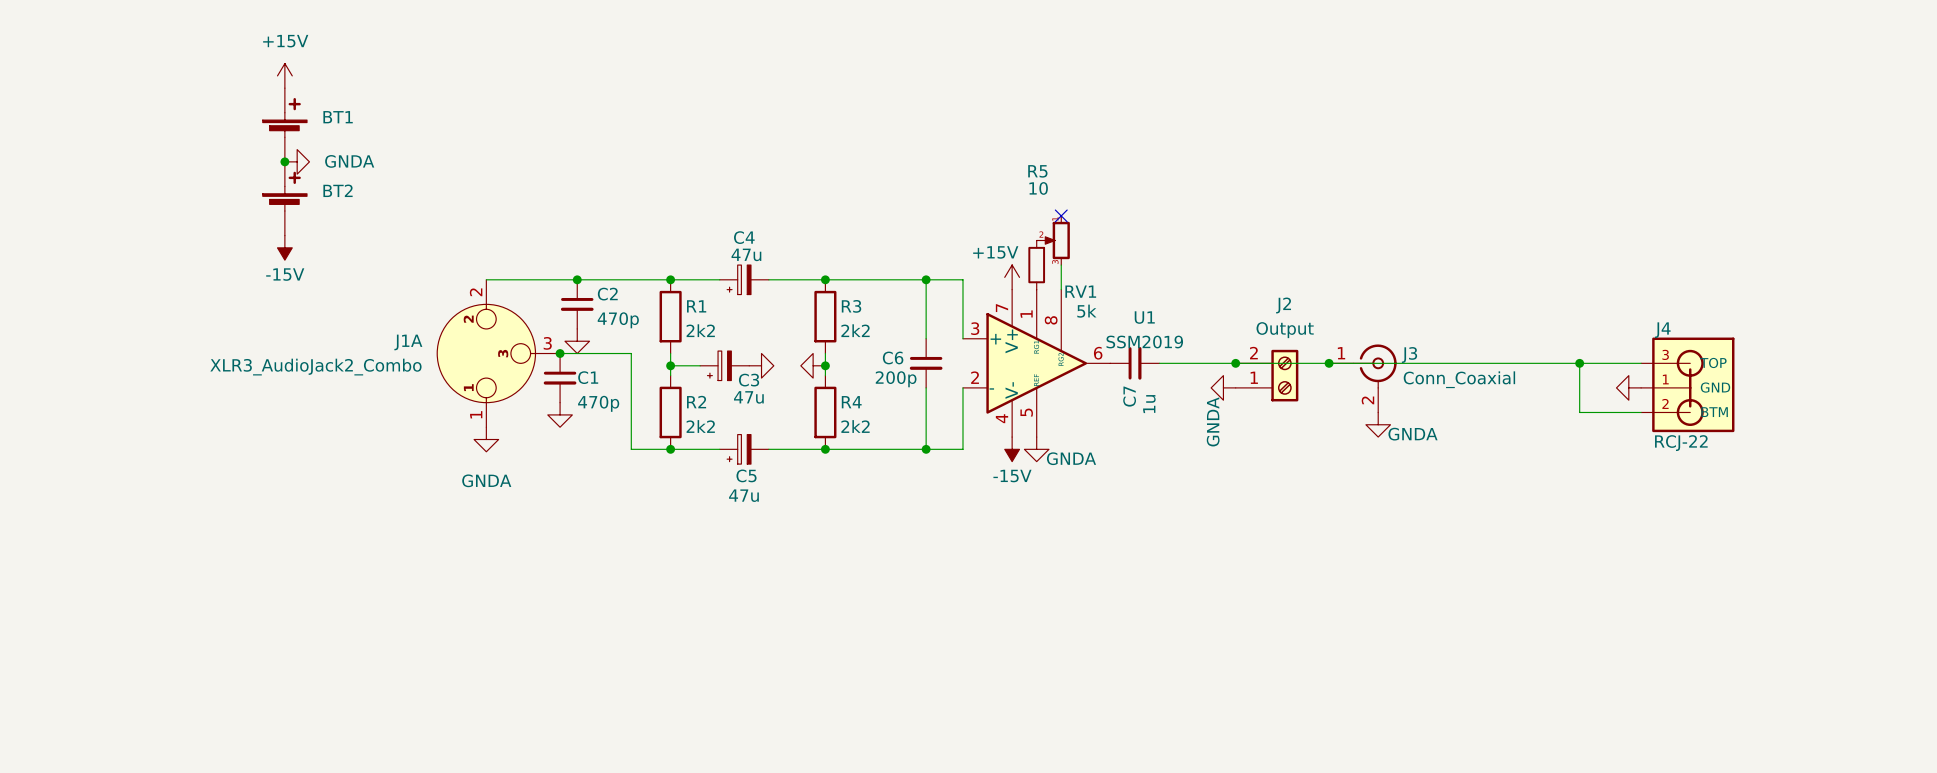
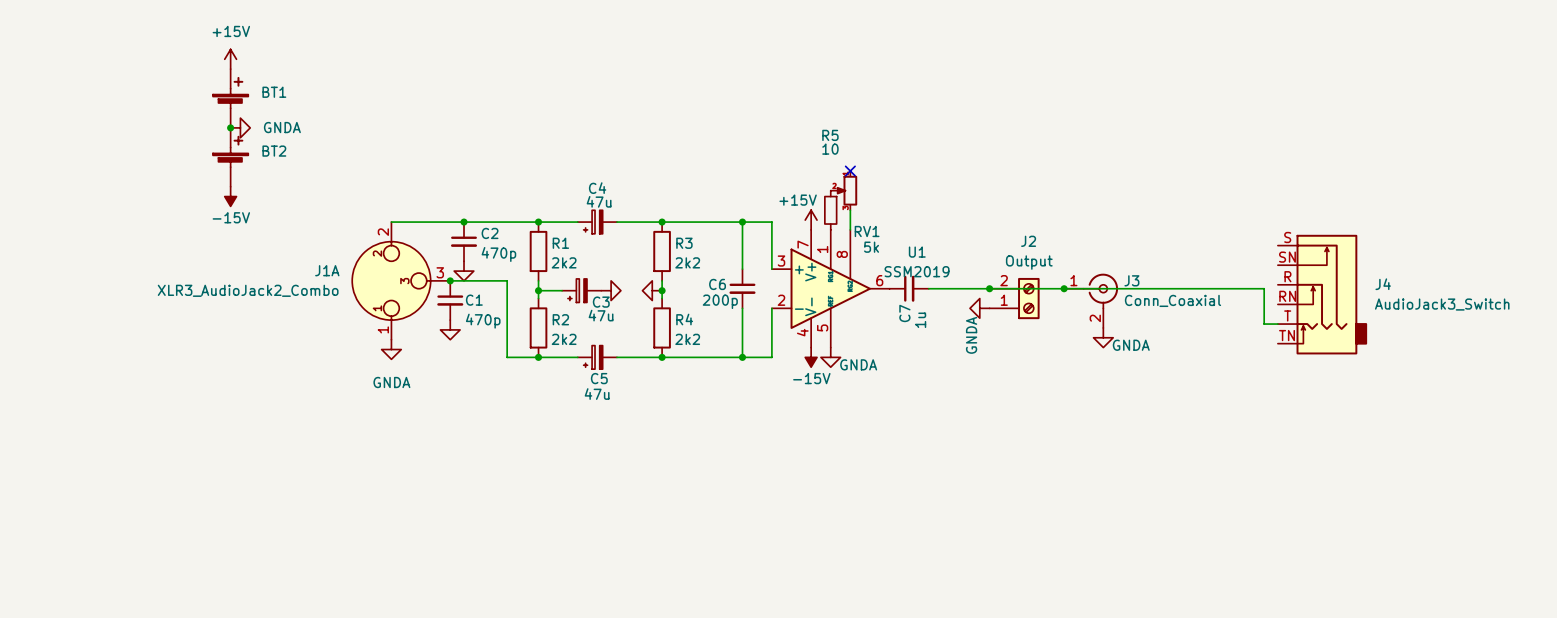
J4 name position: J4 (1662, 330) -> J4 (1383, 284)
J4 symbol: [1641, 337, 1735, 433] -> [1277, 234, 1368, 355]
wire: (1579, 363) (1641, 363) -> none
junction: (1579, 363) -> none
power symbol: (1628, 387) -> none
wire: (1579, 407) (1579, 412) (1641, 412) -> (1264, 324) (1277, 324)
J4 value: RCJ-22 (1681, 443) -> AudioJack3_Switch (1442, 304)

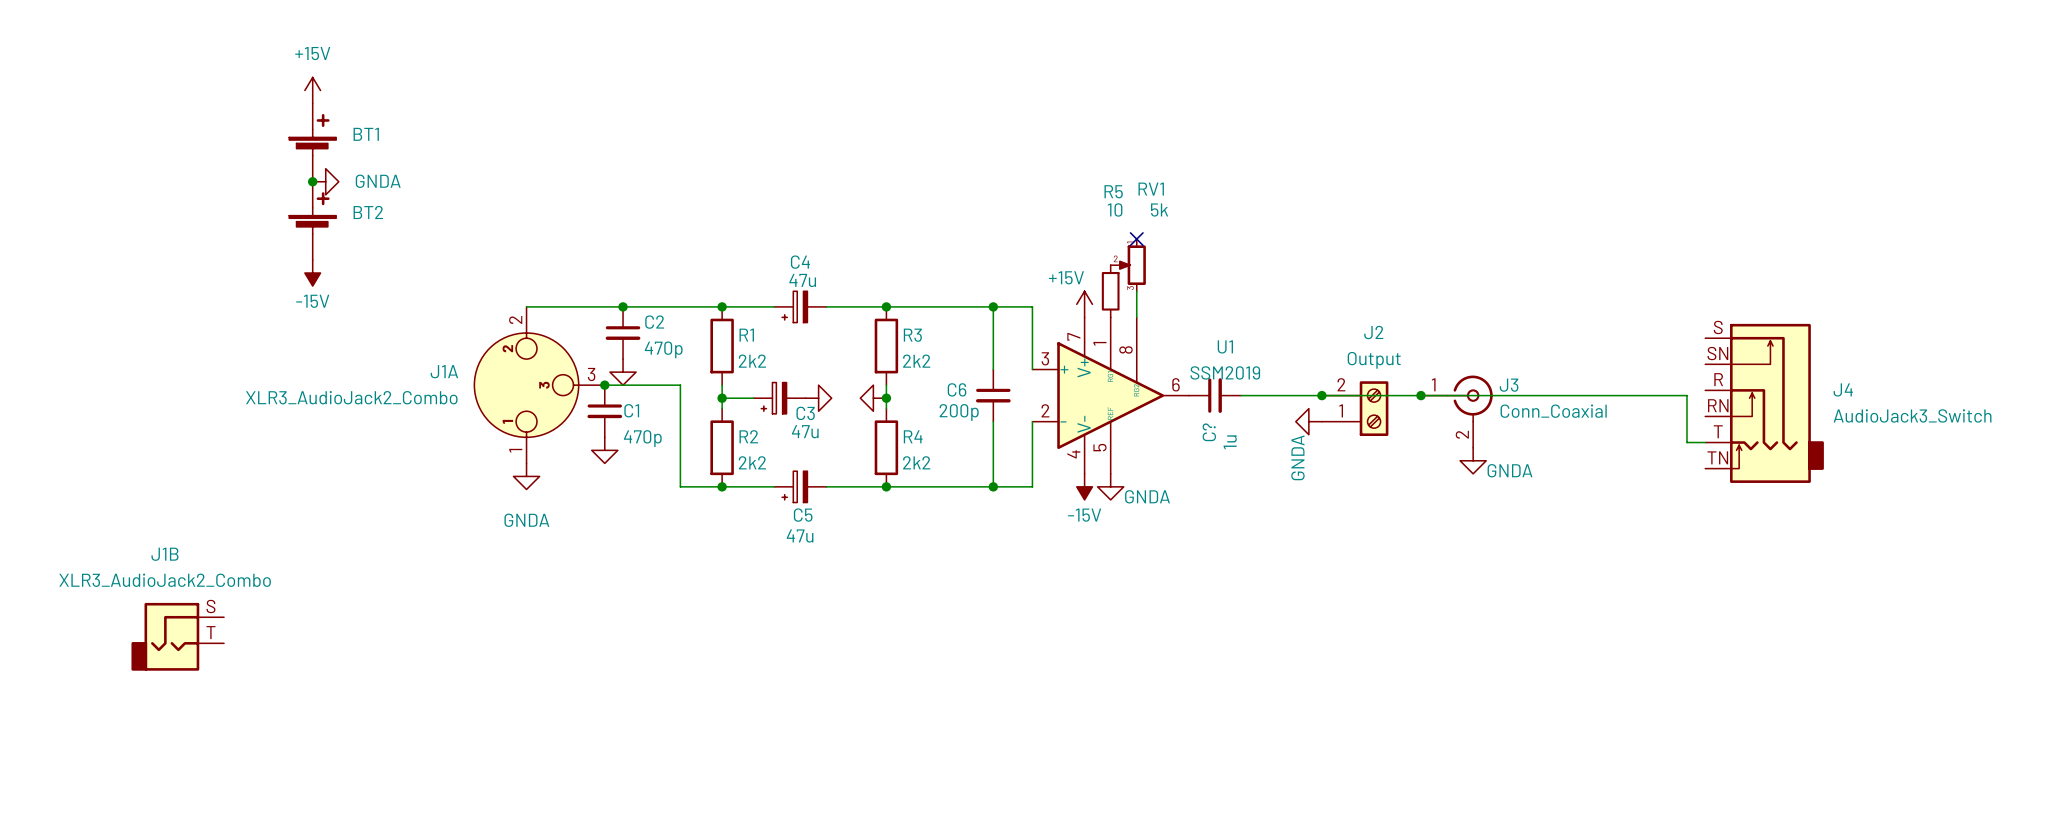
RV1 name position: RV1 (867, 231) -> RV1 (1151, 189)
RV1 value position: 5k (871, 247) -> 5k (1159, 210)
C7 name: C7 (904, 313) -> C? (1209, 432)
J1B: none -> XLR3_AudioJack2_Combo (177, 636)

